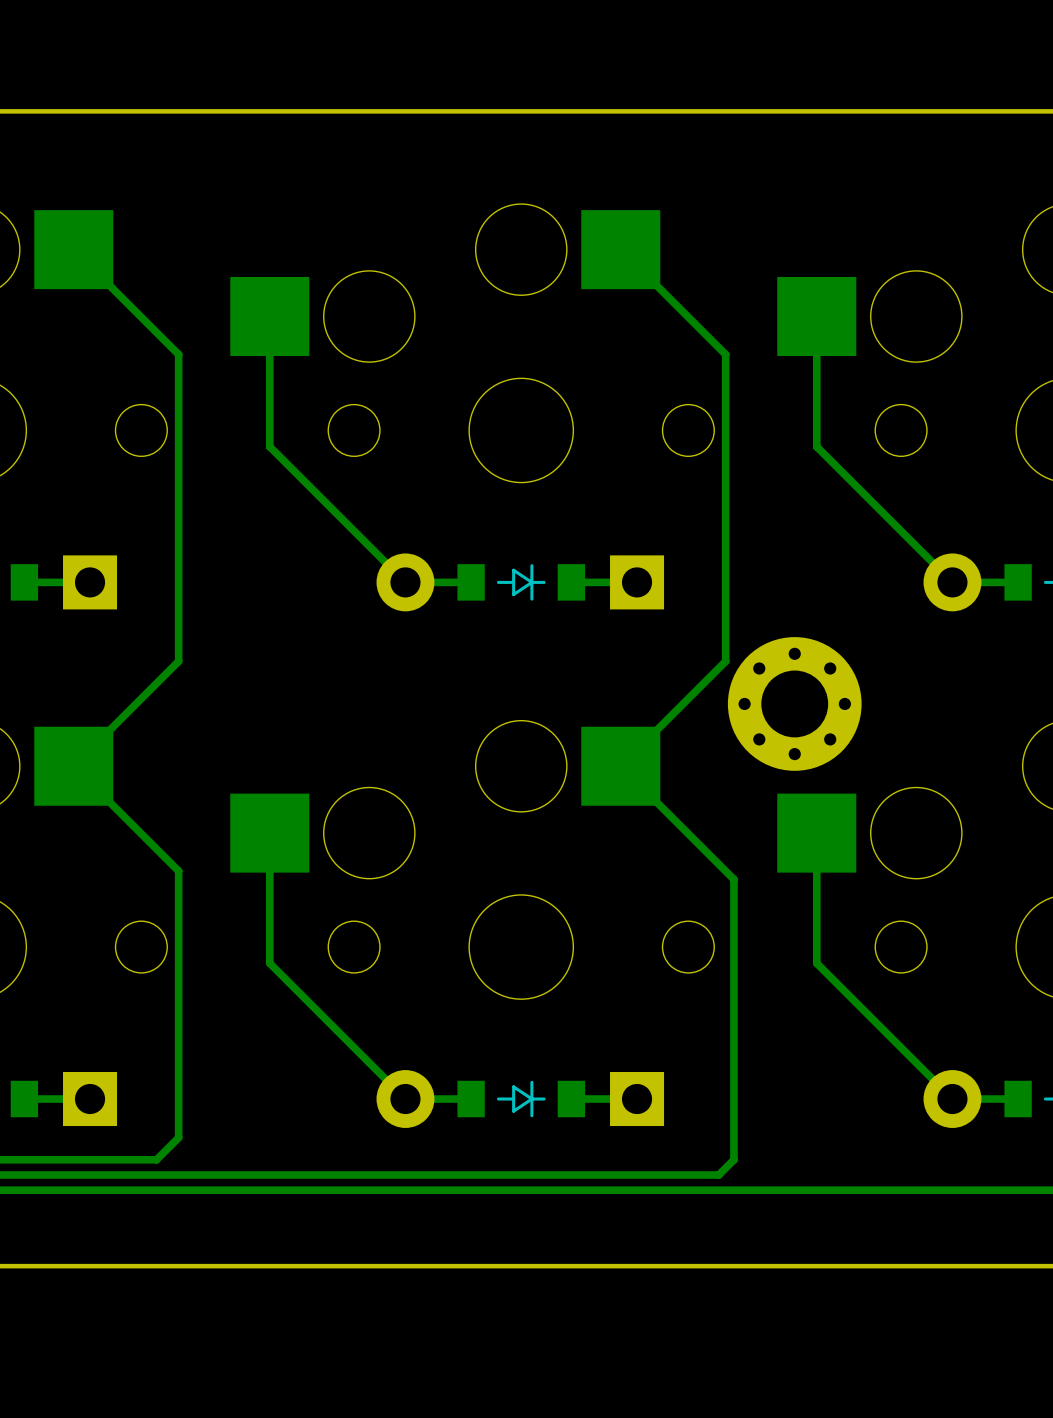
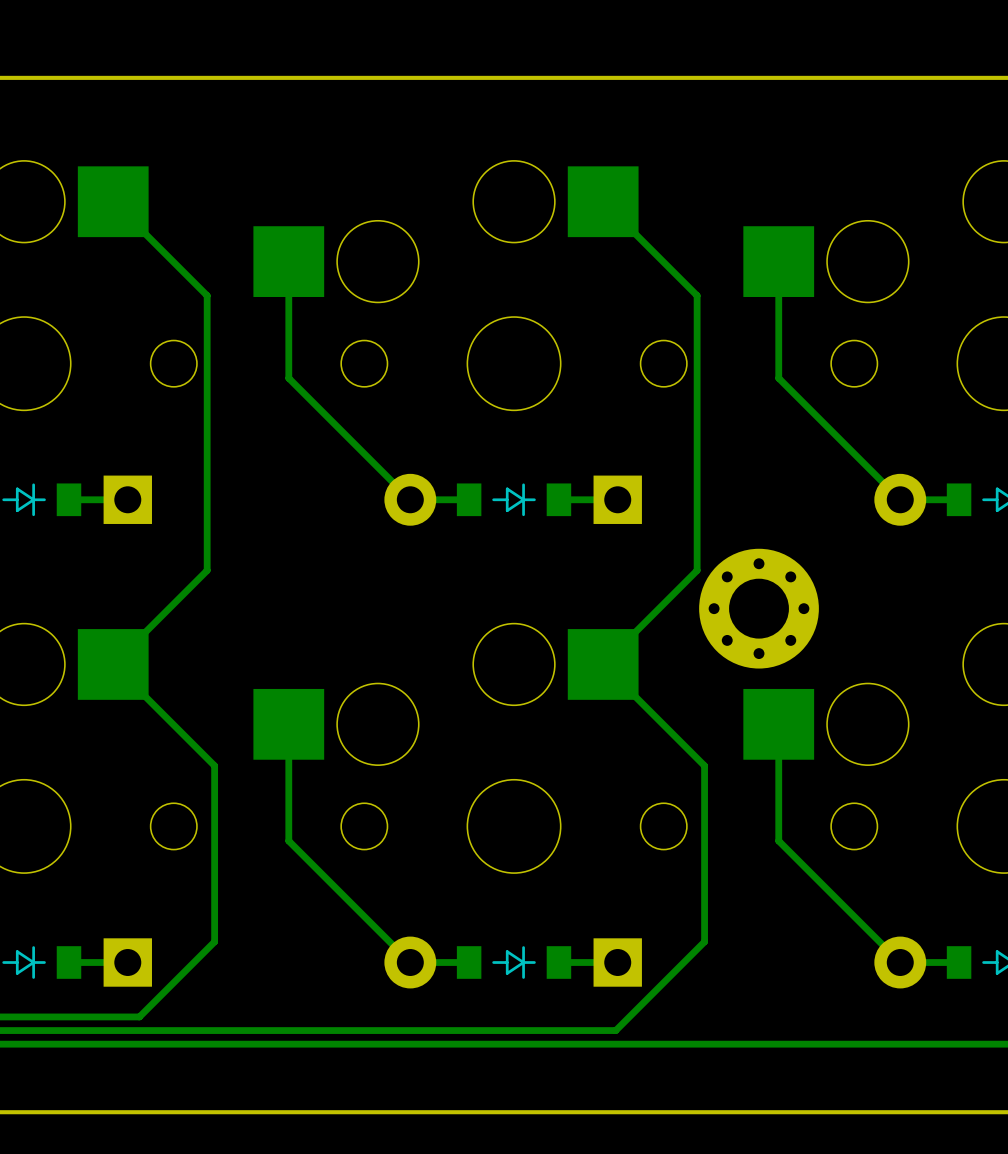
track: (178, 871) (178, 1137) (156, 1159) (103, 1159) -> (207, 758) (214, 765) (214, 941) (139, 1016)
track: (733, 1075) (733, 1159) (718, 1174) (634, 1174) -> (704, 941) (615, 1030)

